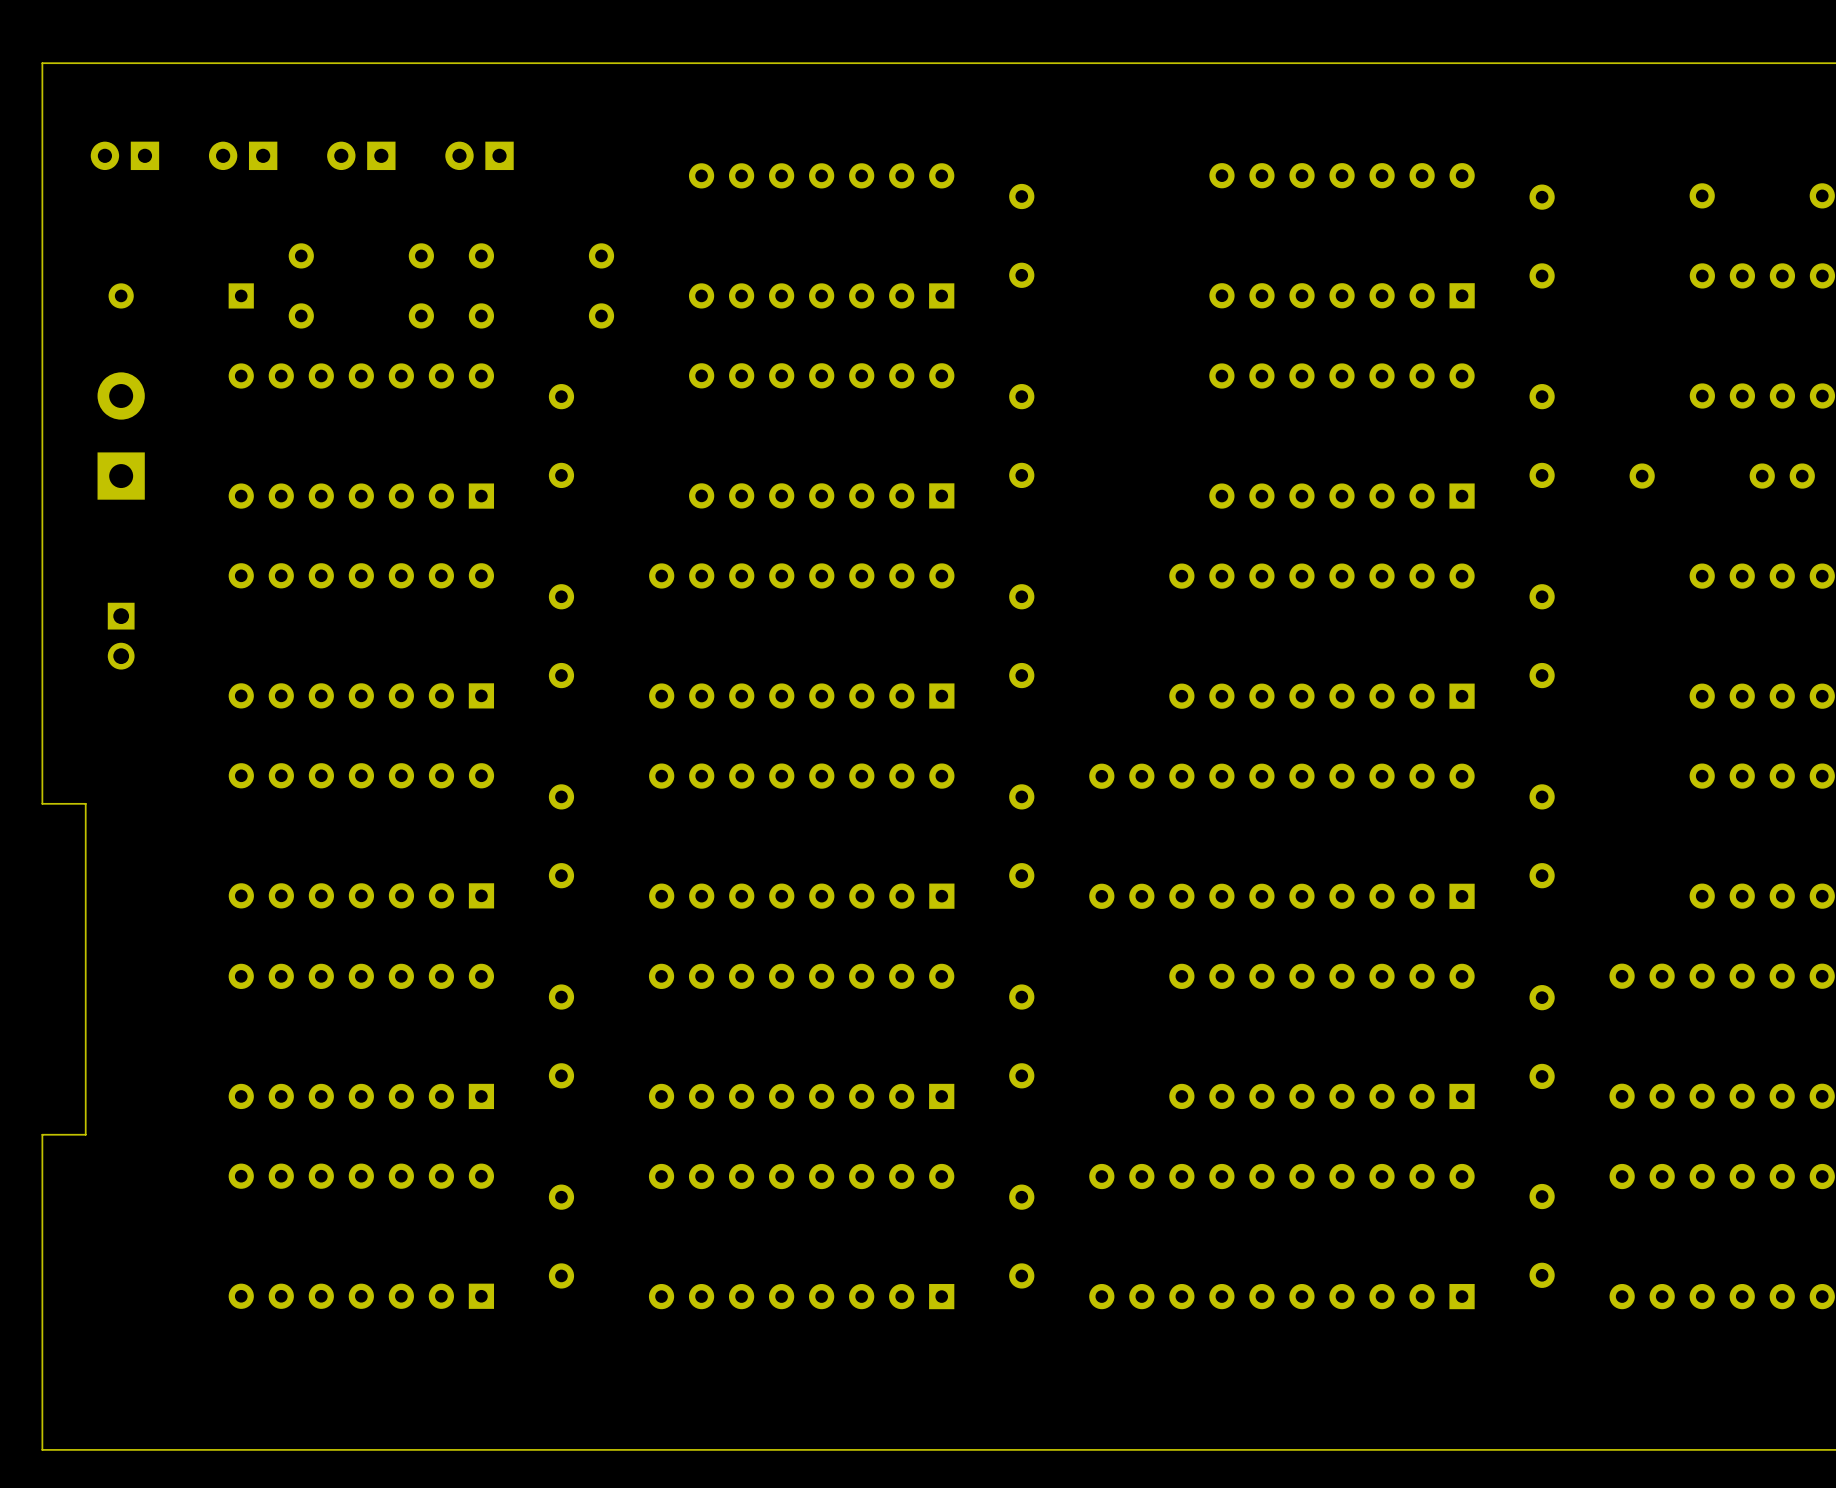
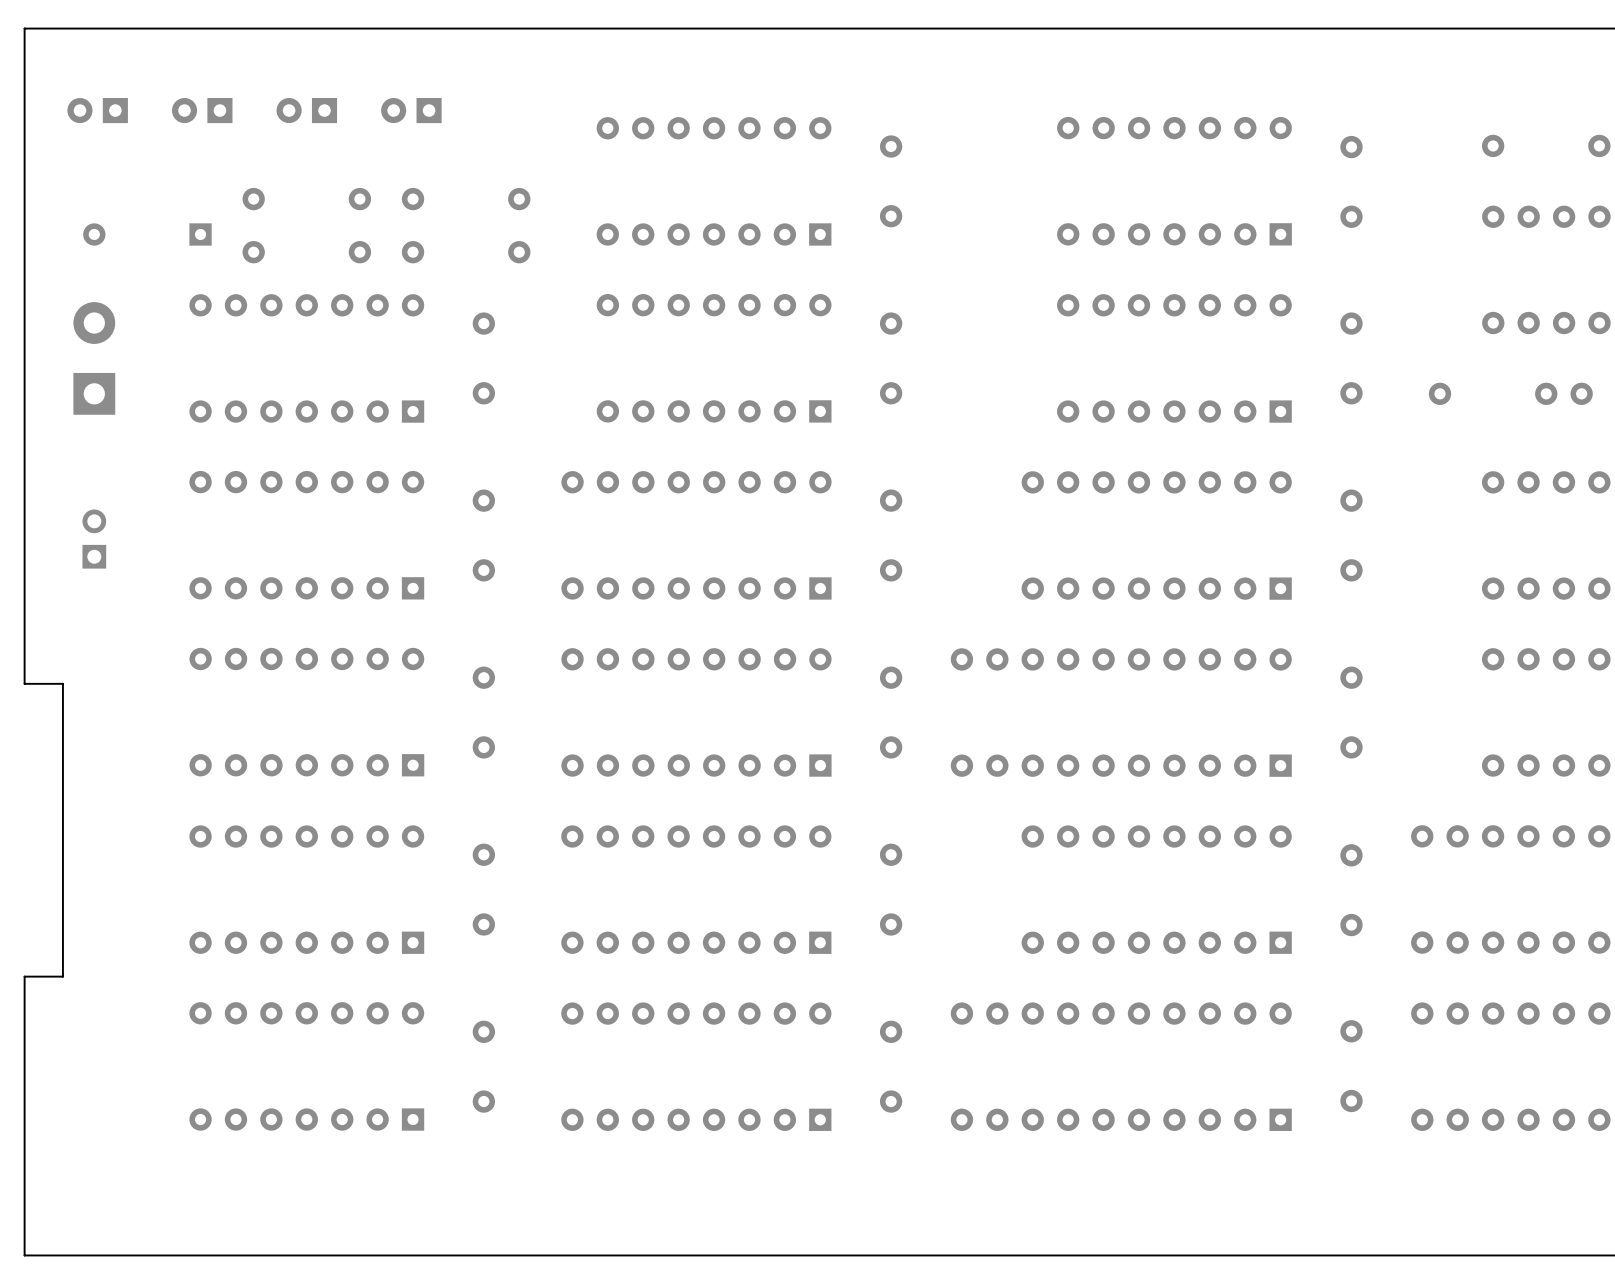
part rotation: 0° (121, 636) -> 180° (94, 539)

